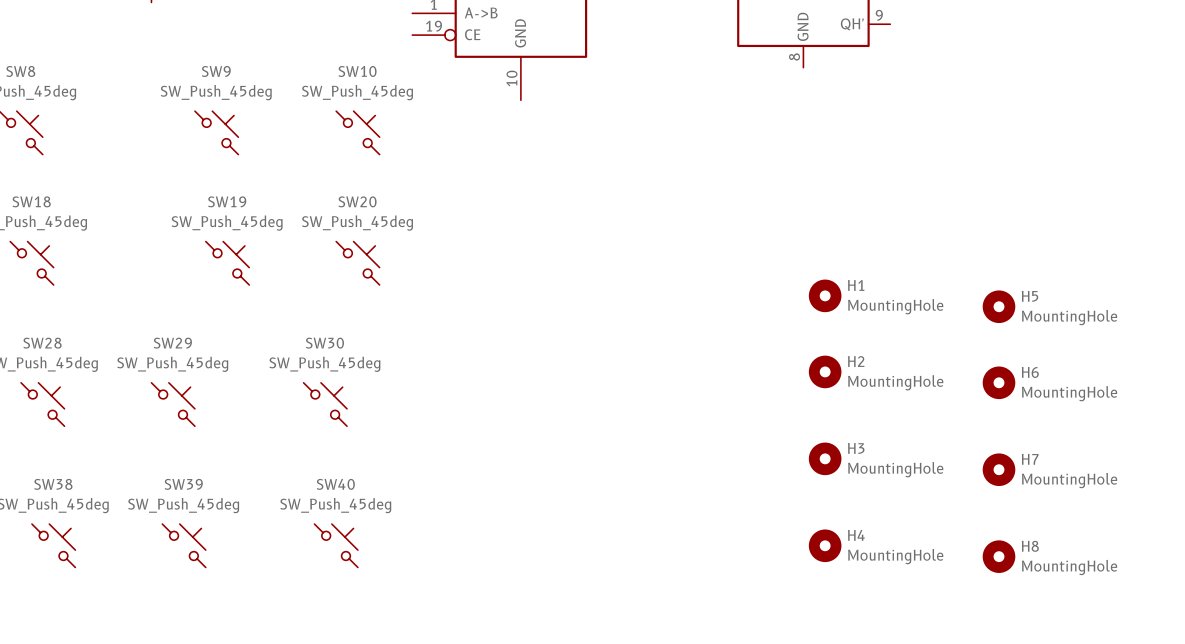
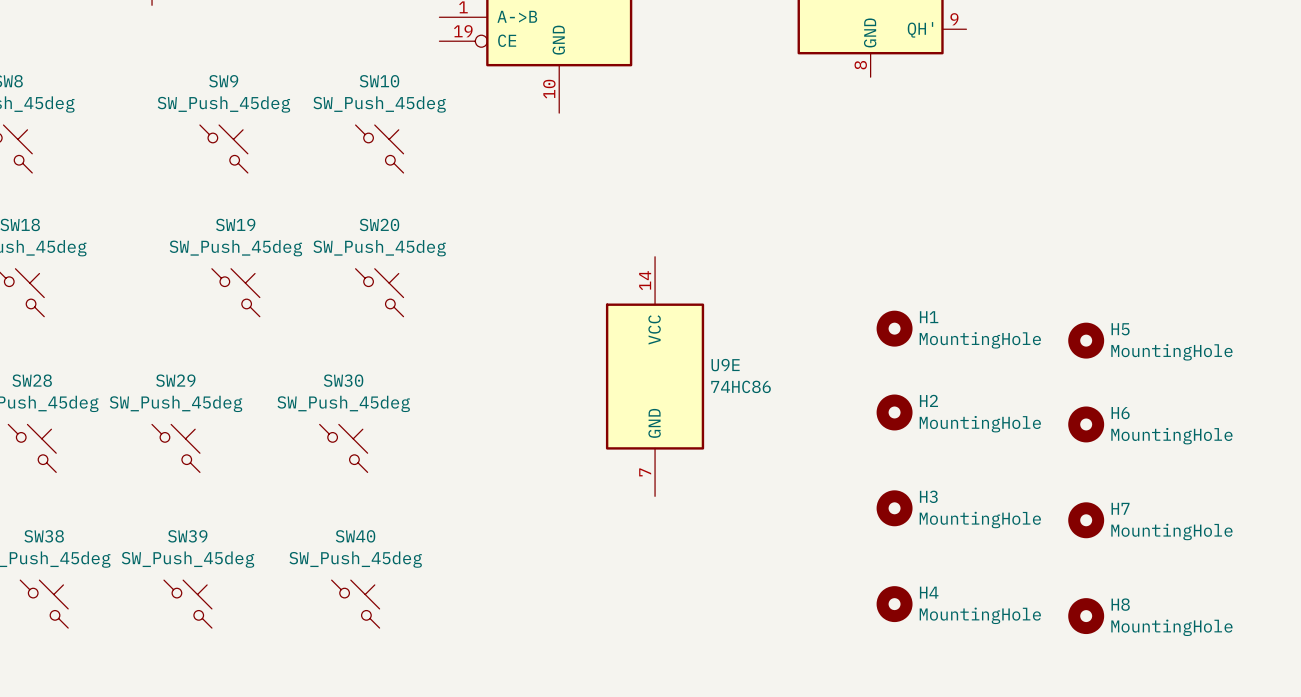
U9E: none -> 74HC86 (655, 376)

